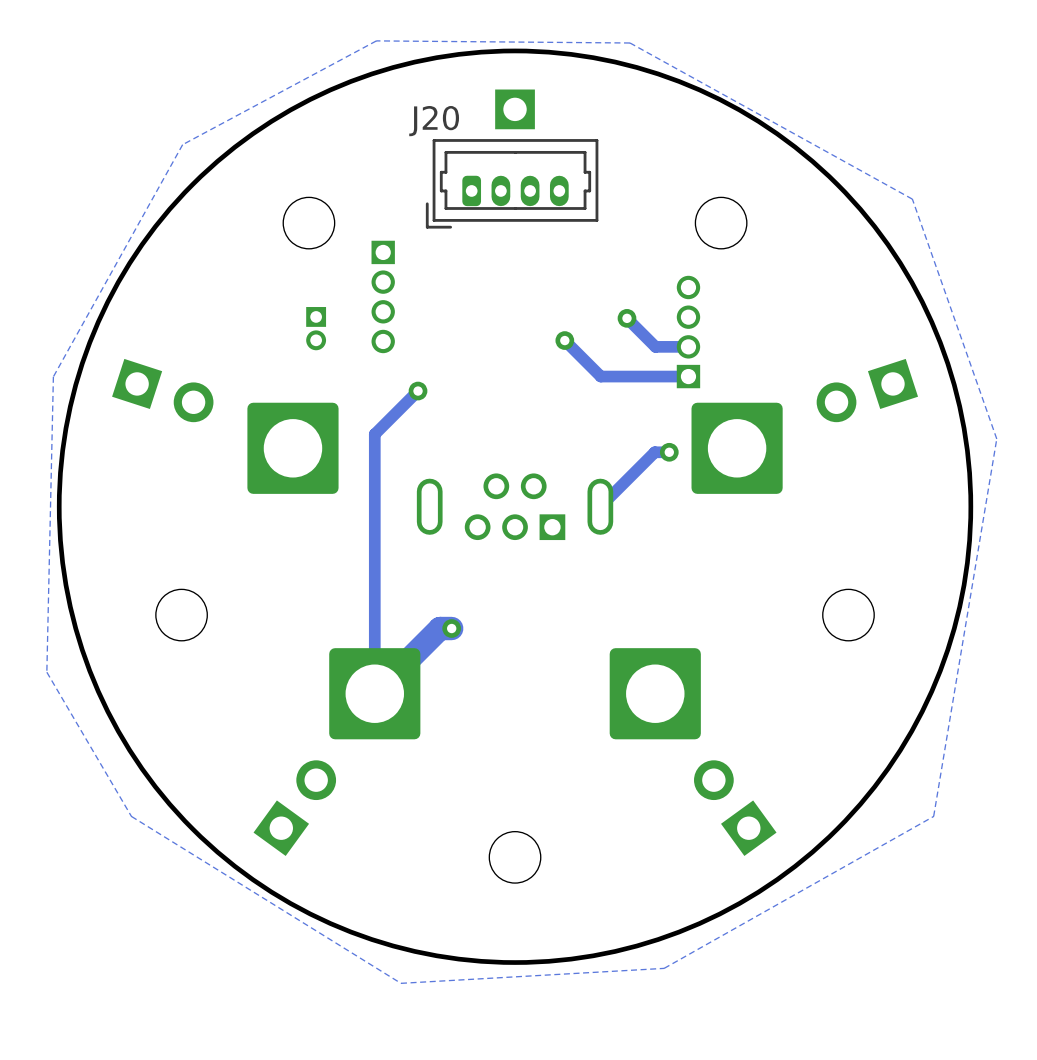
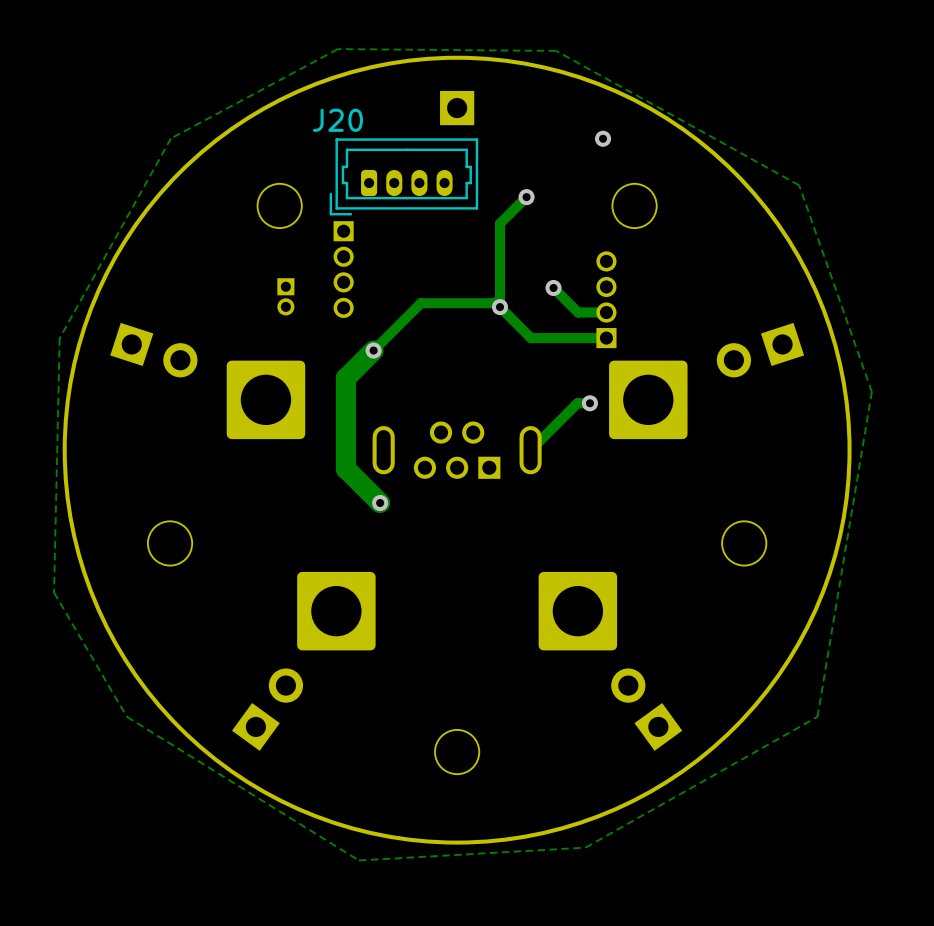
via: none -> (603, 138)
J20 position: (512, 183) -> (403, 176)
track: none -> (526, 197) (500, 223) (500, 307) (495, 302)
via: none -> (526, 197)
track: none -> (496, 303) (420, 303) (373, 350)
track width: thin (418, 391) (385, 423) -> thick (373, 350) (345, 378)
track: (385, 423) (374, 434) (374, 693) (440, 628) (451, 628) -> (345, 378) (345, 468) (380, 503)
via position: (451, 628) -> (380, 503)

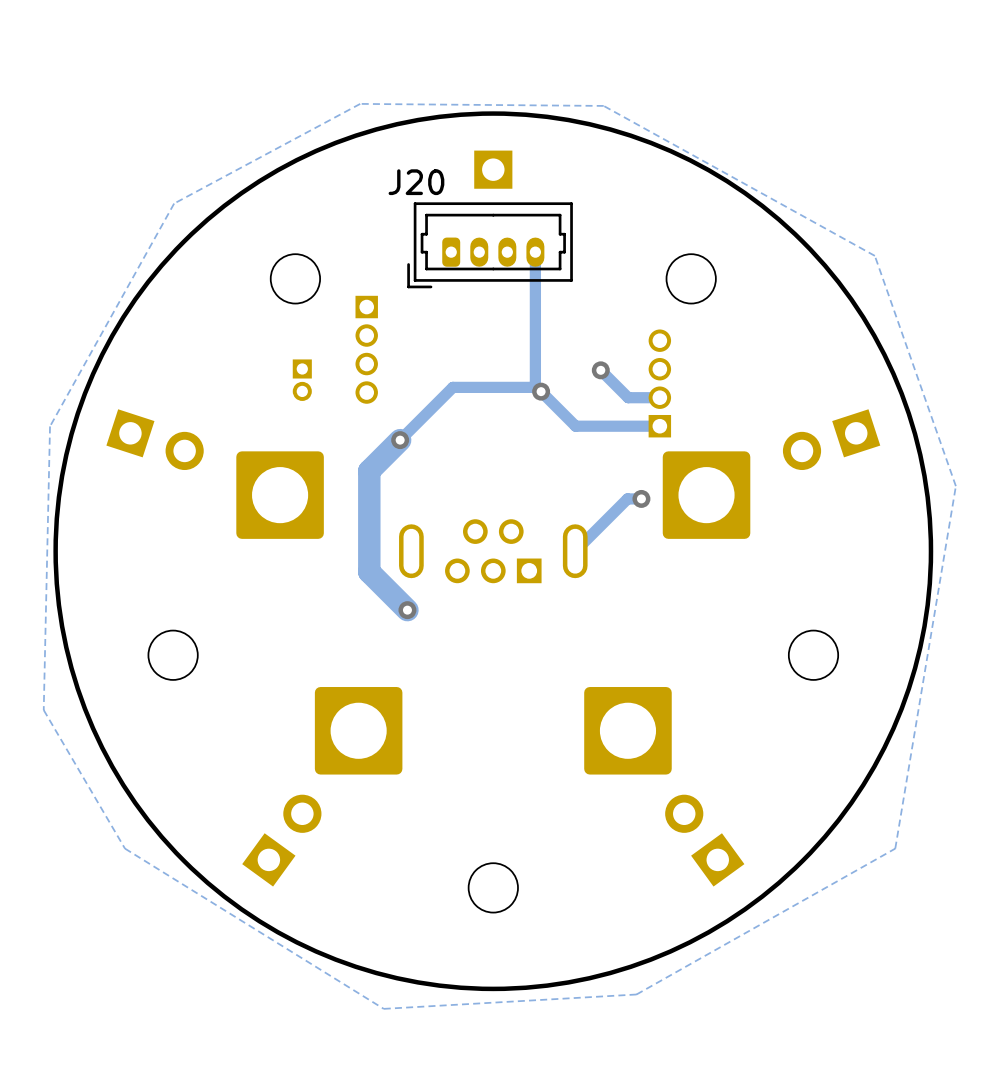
via: (603, 138) -> none
J20 position: (403, 176) -> (490, 245)
track: none -> (535, 252) (535, 386)
track: (526, 197) (500, 223) (500, 307) -> none
via: (526, 197) -> none

